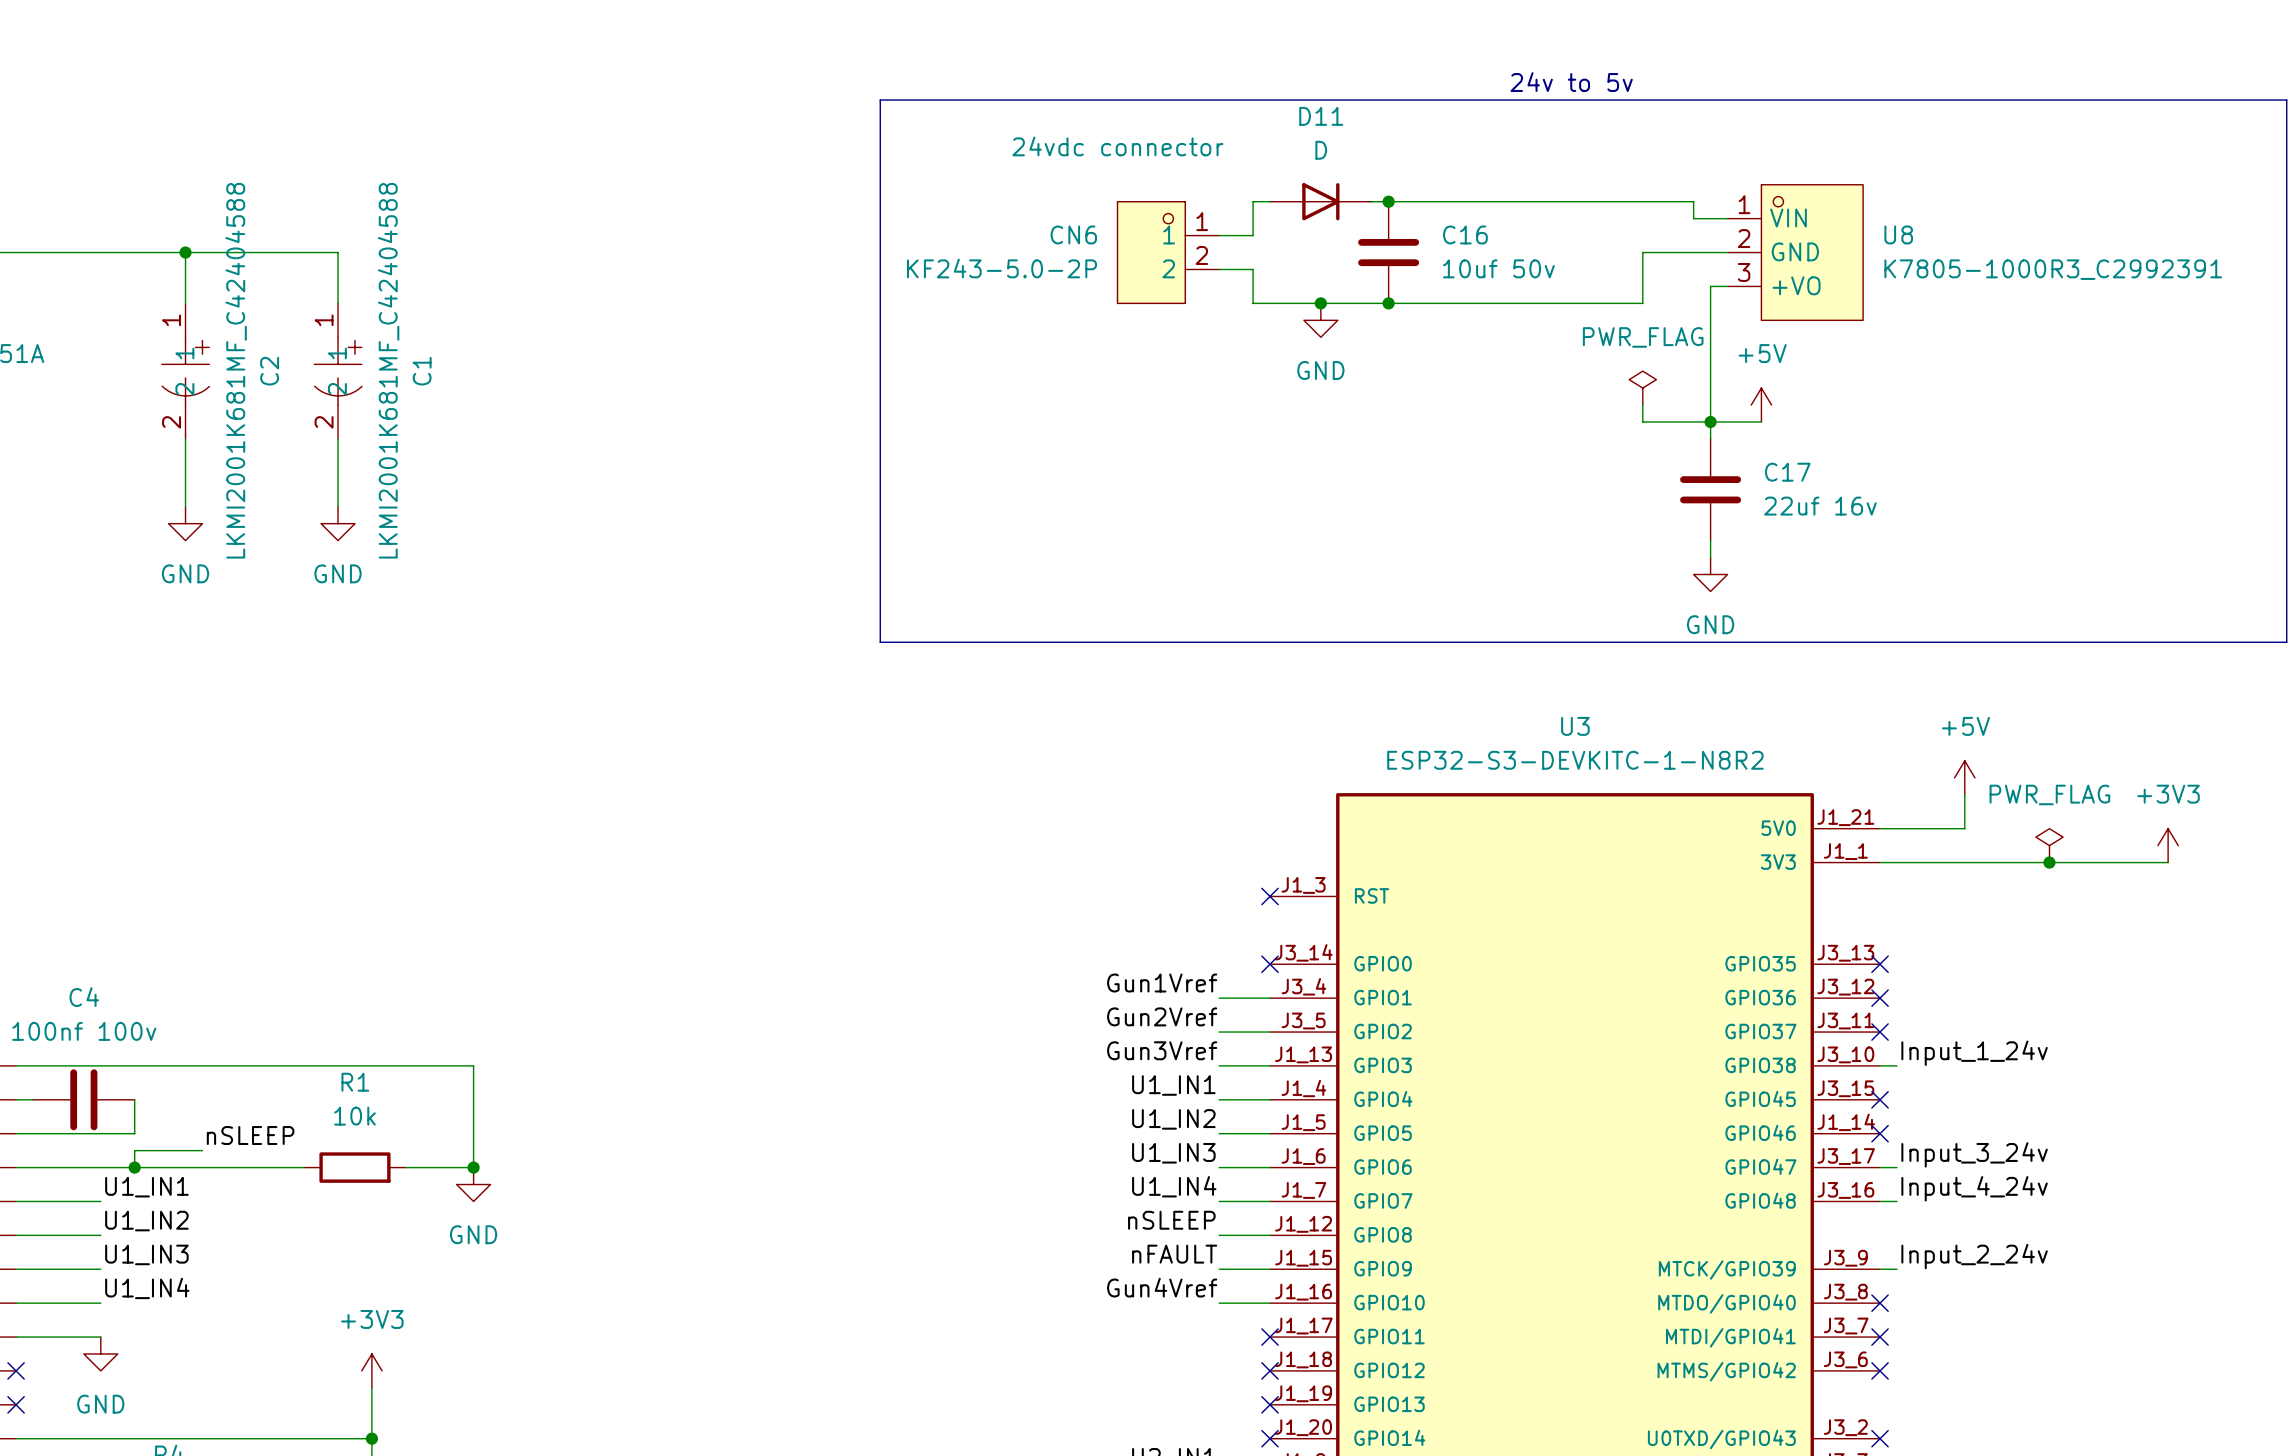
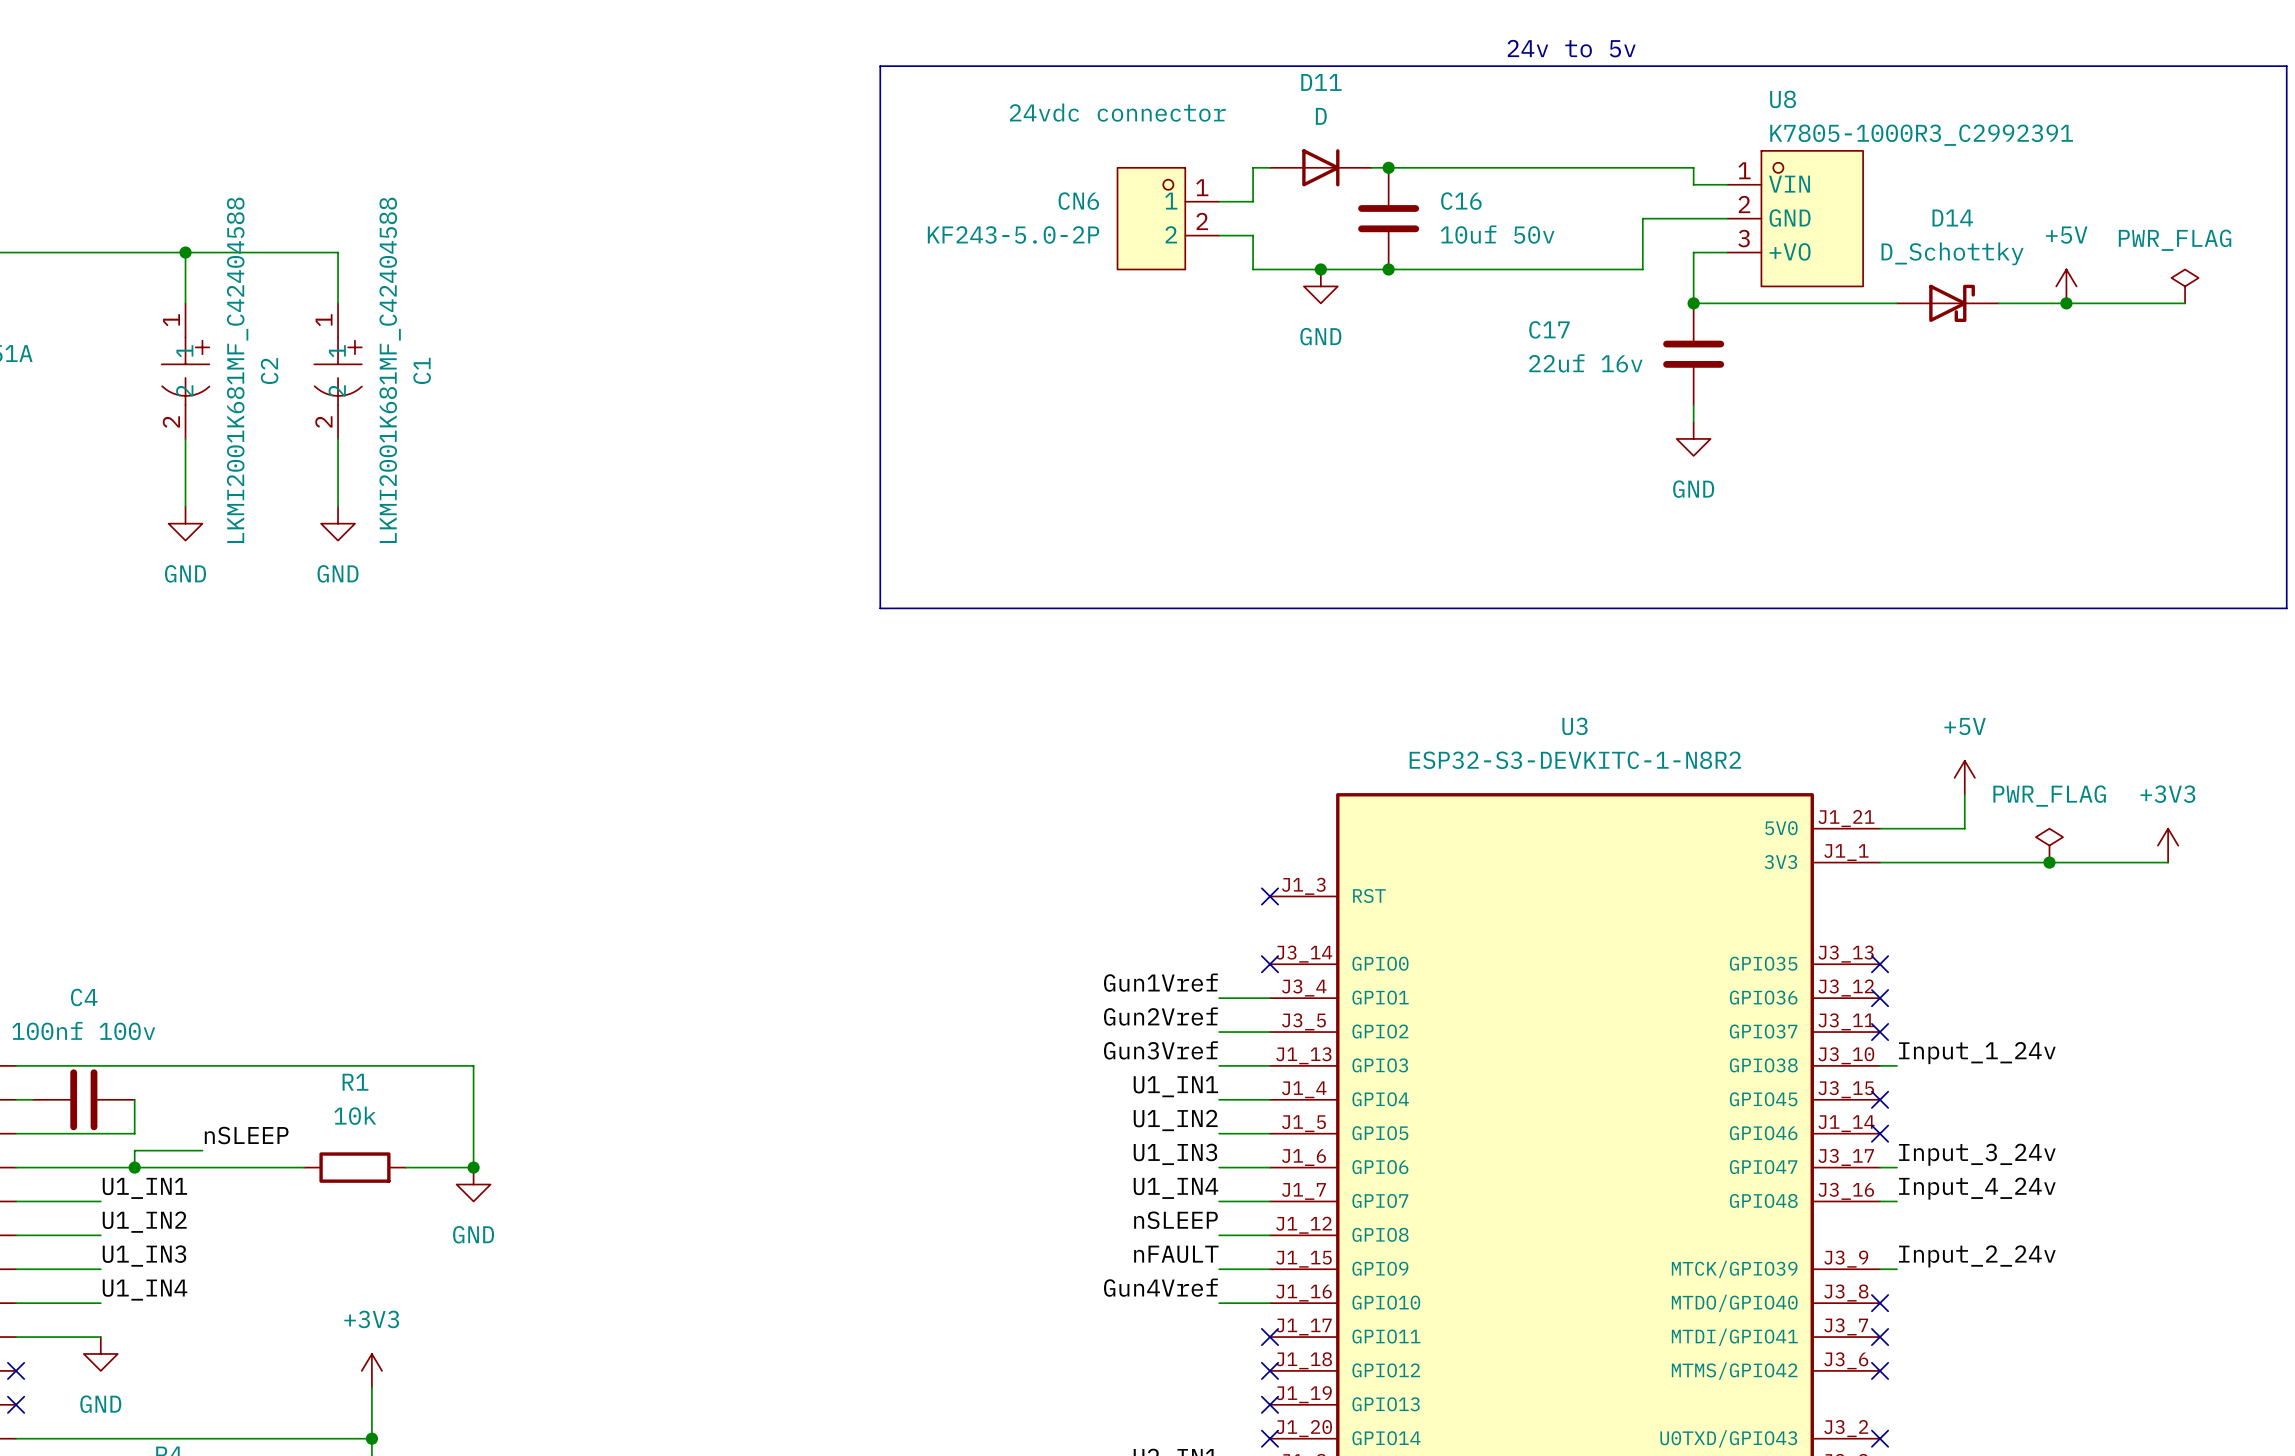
text position: 24v to 5v (1571, 82) -> 24v to 5v (1571, 48)
line: (880, 100) (2286, 100) -> (880, 100) (880, 66) (2286, 66) (2286, 100)
wire: none -> (1270, 167) (1253, 167) (1253, 201) (1219, 201)
wire: none -> (1371, 167) (1693, 167) (1693, 184) (1727, 184)
junction: none -> (1388, 167)
wire: (1270, 201) (1253, 201) (1253, 235) -> none
D11 position: (1320, 201) -> (1320, 167)
wire: (1371, 201) (1693, 201) (1693, 218) -> none
junction: (1388, 201) -> none
U8 name position: U8 (1898, 234) -> U8 (1783, 99)
CN6 position: (1168, 252) -> (1168, 218)
C16 position: (1388, 252) -> (1388, 218)
wire: (1642, 252) (1693, 252) -> (1642, 252) (1642, 218) (1693, 218)
wire: none -> (1693, 252) (1693, 303) (1896, 303)
U8 position: (1795, 252) -> (1795, 218)
wire: (1219, 269) (1253, 269) (1253, 303) (1642, 303) (1642, 269) -> (1253, 235) (1253, 269) (1642, 269)
junction: none -> (1388, 269)
U8 value position: K7805-1000R3_C2992391 (2053, 269) -> K7805-1000R3_C2992391 (1921, 135)
wire: (1727, 286) (1710, 286) (1710, 438) -> none
power symbol: none -> PWR_FLAG (2185, 286)
junction position: (1320, 303) -> (1320, 269)
junction: (1388, 303) -> none
junction: none -> (1693, 303)
D14: none -> D_Schottky (1947, 303)
wire: none -> (1998, 303) (2185, 303)
junction: none -> (2066, 303)
power symbol position: GND (1320, 320) -> GND (1320, 286)
power symbol: PWR_FLAG (1642, 388) -> none
wire: (1642, 405) (1642, 421) (1761, 421) -> none
power symbol position: +5V (1761, 405) -> +5V (2066, 286)
junction: (1710, 421) -> none
C17 name position: C17 (1787, 472) -> C17 (1549, 329)
C17 position: (1710, 489) -> (1693, 354)
C17 value position: 22uf 16v (1820, 506) -> 22uf 16v (1585, 363)
wire: (1710, 540) (1710, 557) -> (1693, 405) (1693, 421)
power symbol position: GND (1710, 574) -> GND (1693, 438)
line: (880, 608) (880, 642) (2286, 642) (2286, 608) -> (880, 608) (2286, 608)

